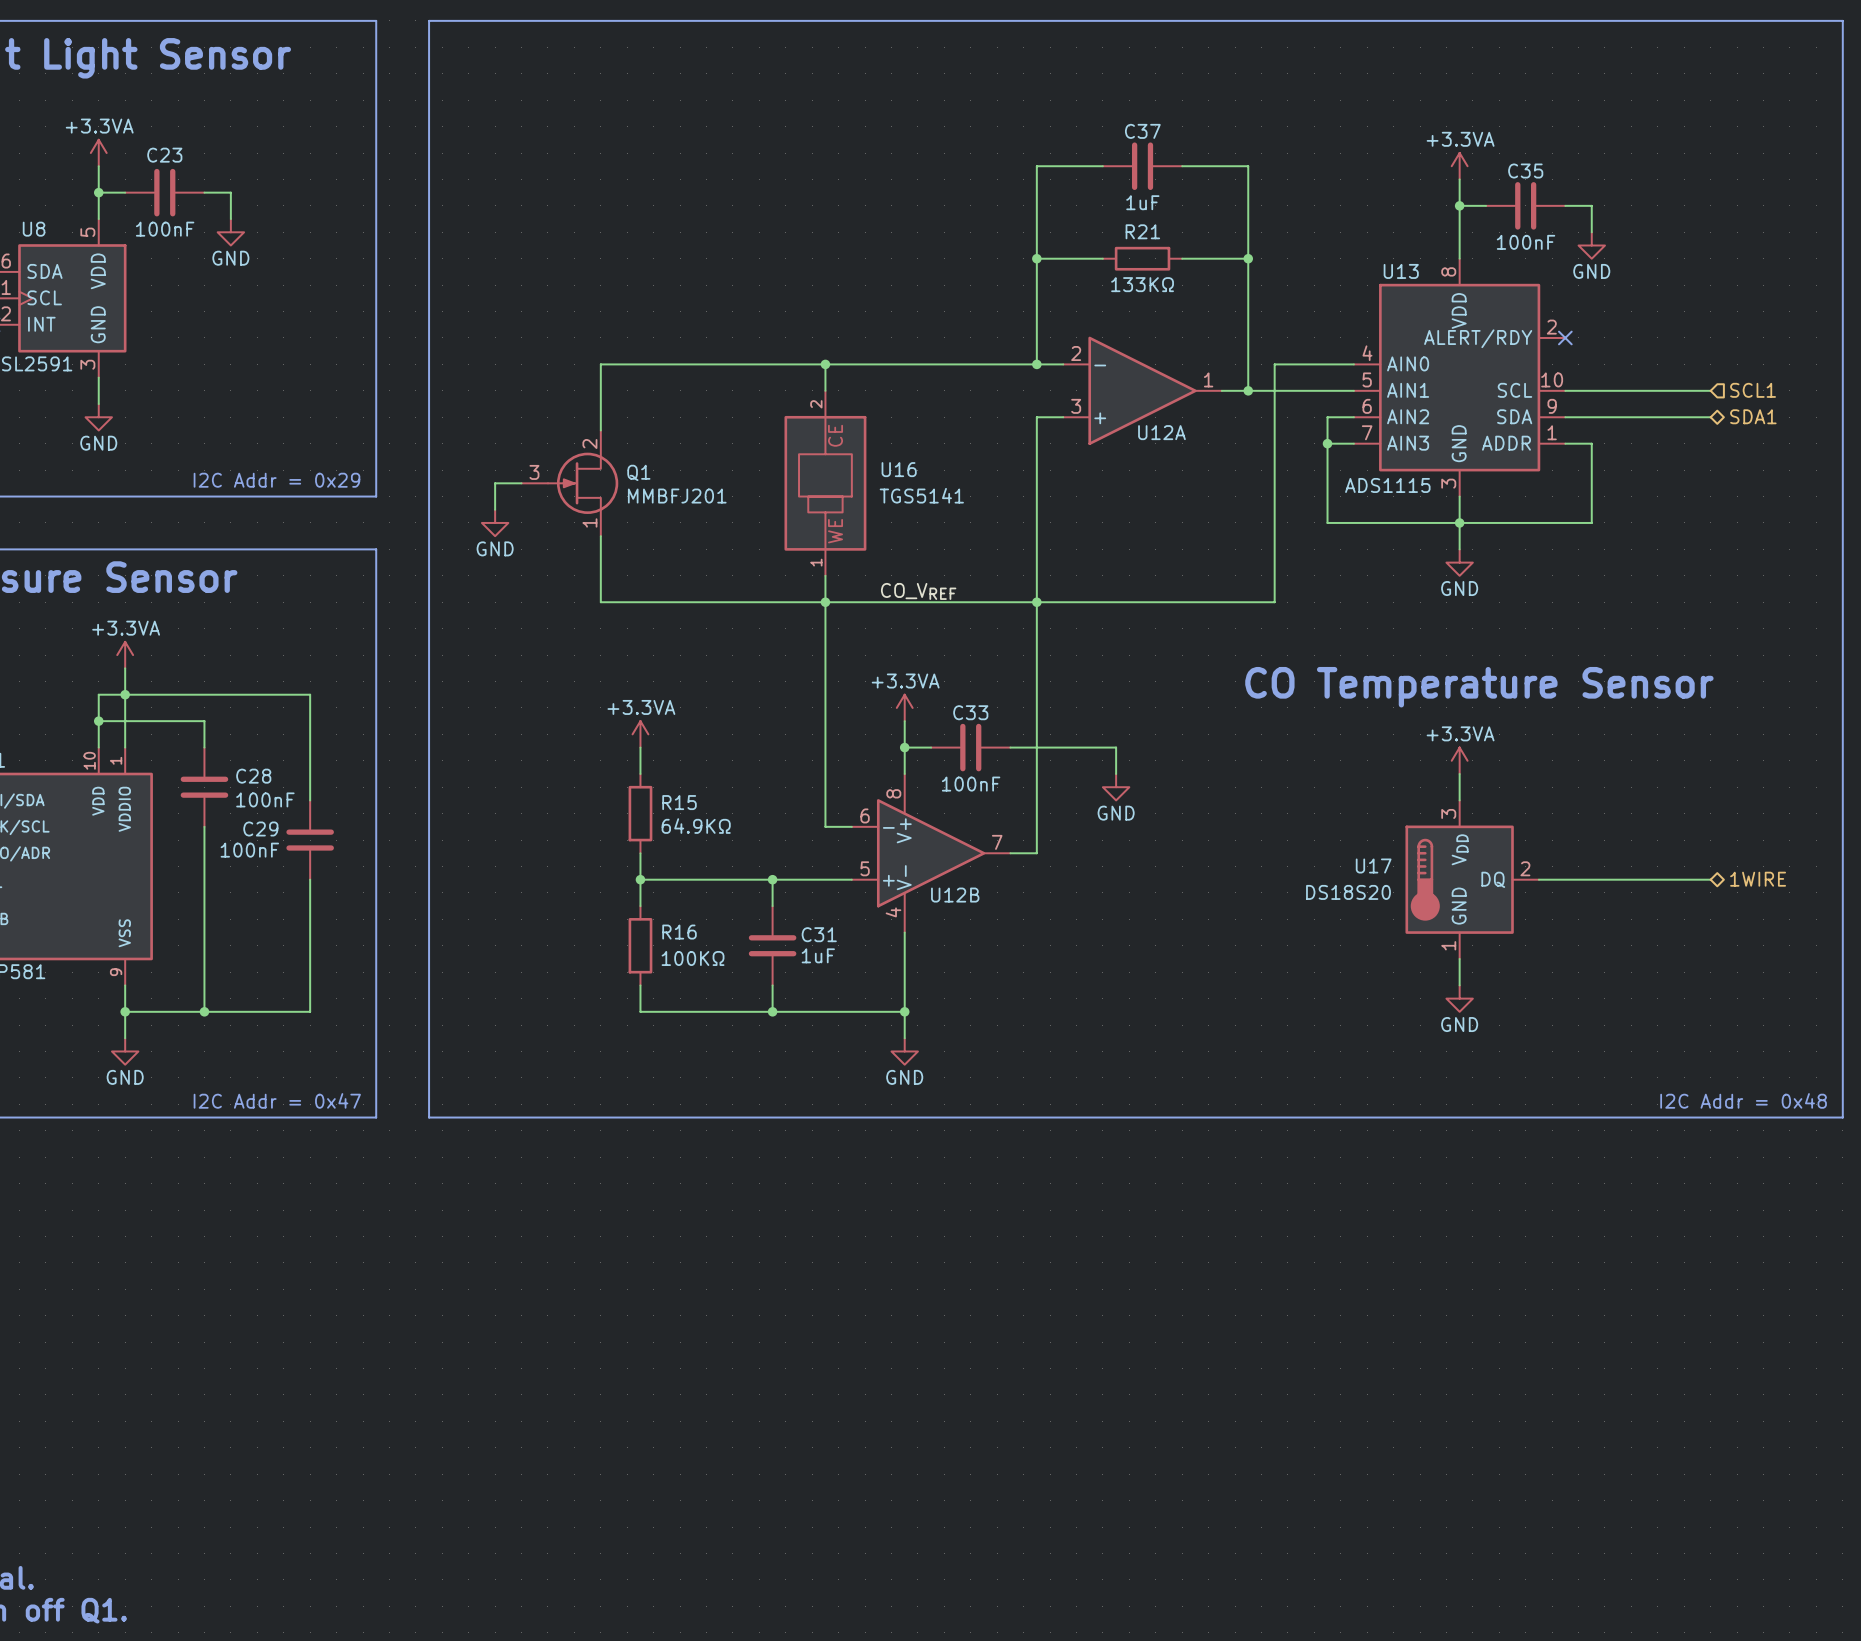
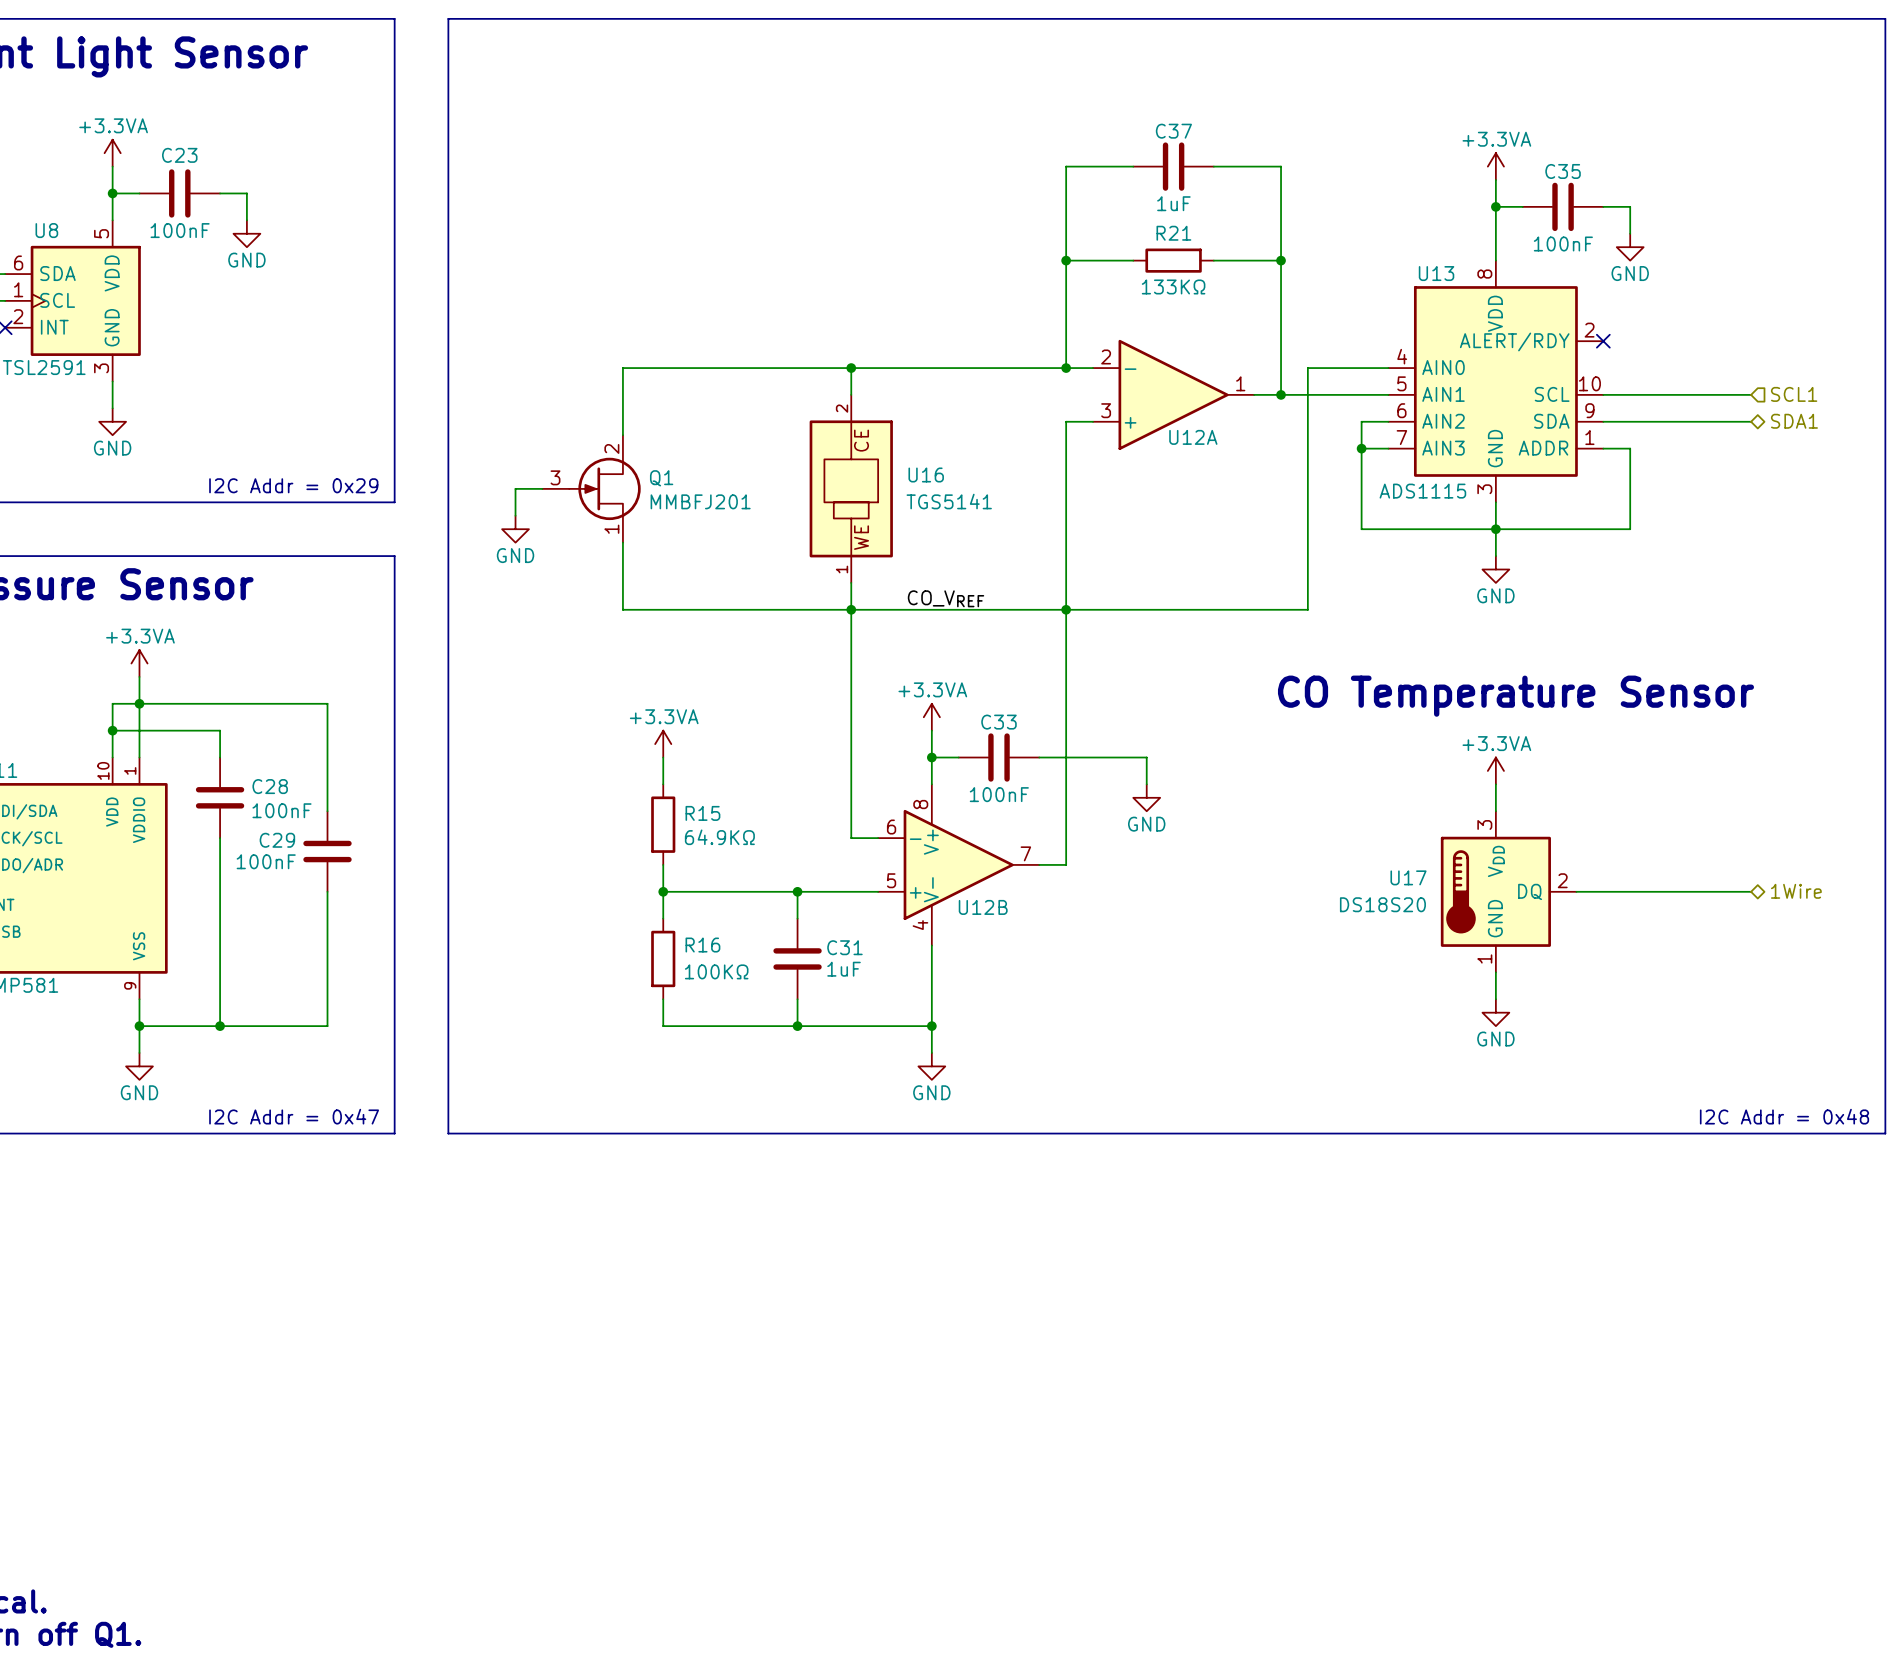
hierarchical label: 1WIRE (1758, 879) -> 1Wire (1796, 891)

